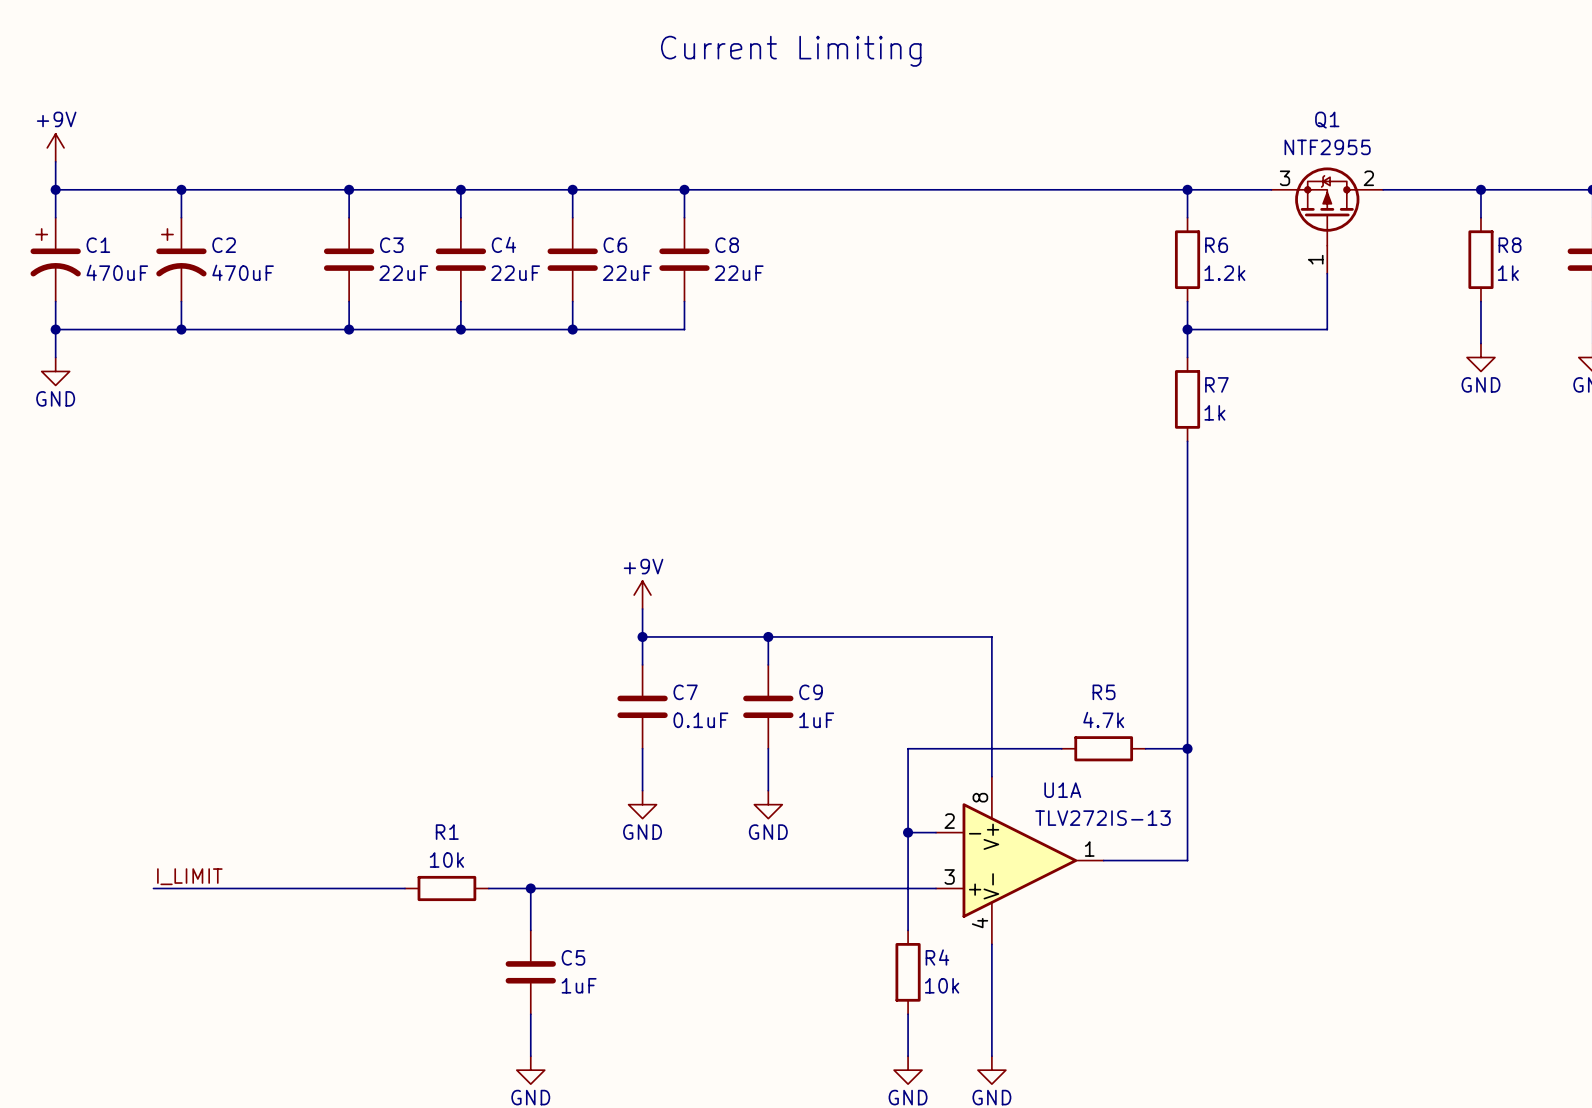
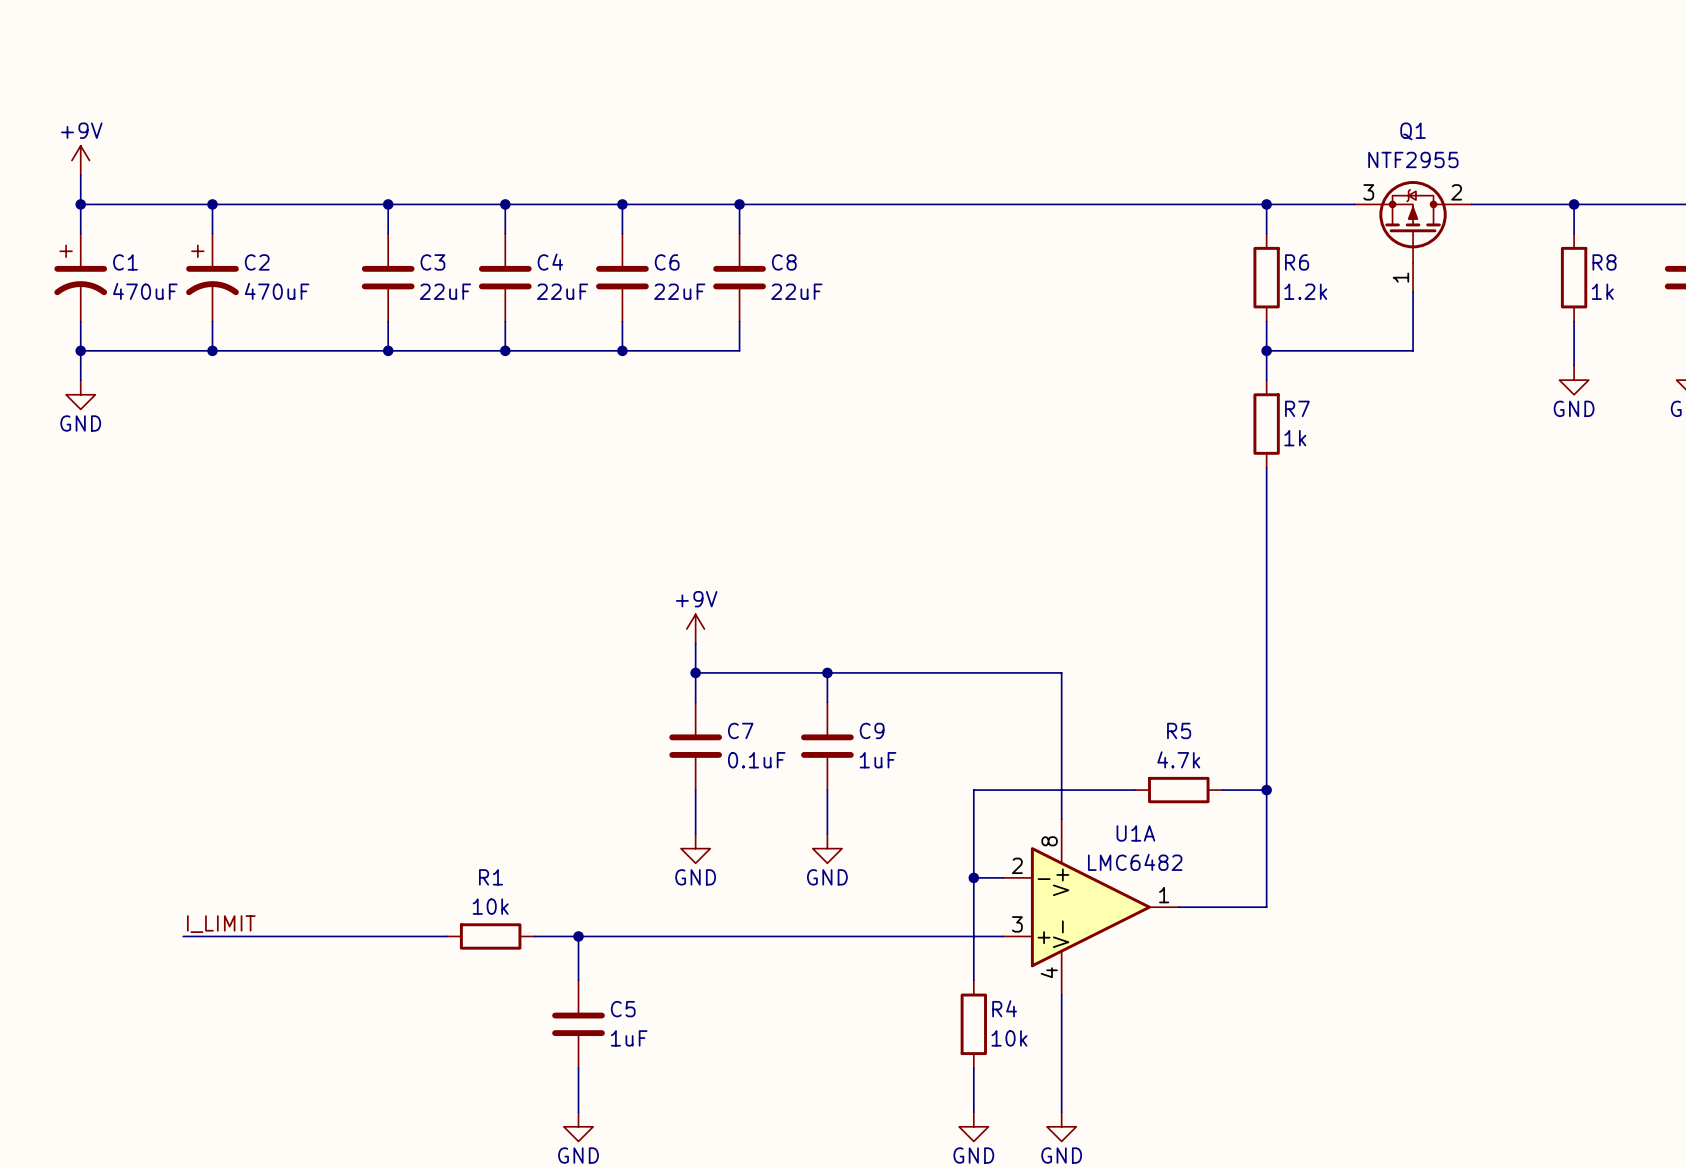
text: Current Limiting (791, 51) -> none
U1A value: TLV272IS-13 (1103, 818) -> LMC6482 (1135, 862)

